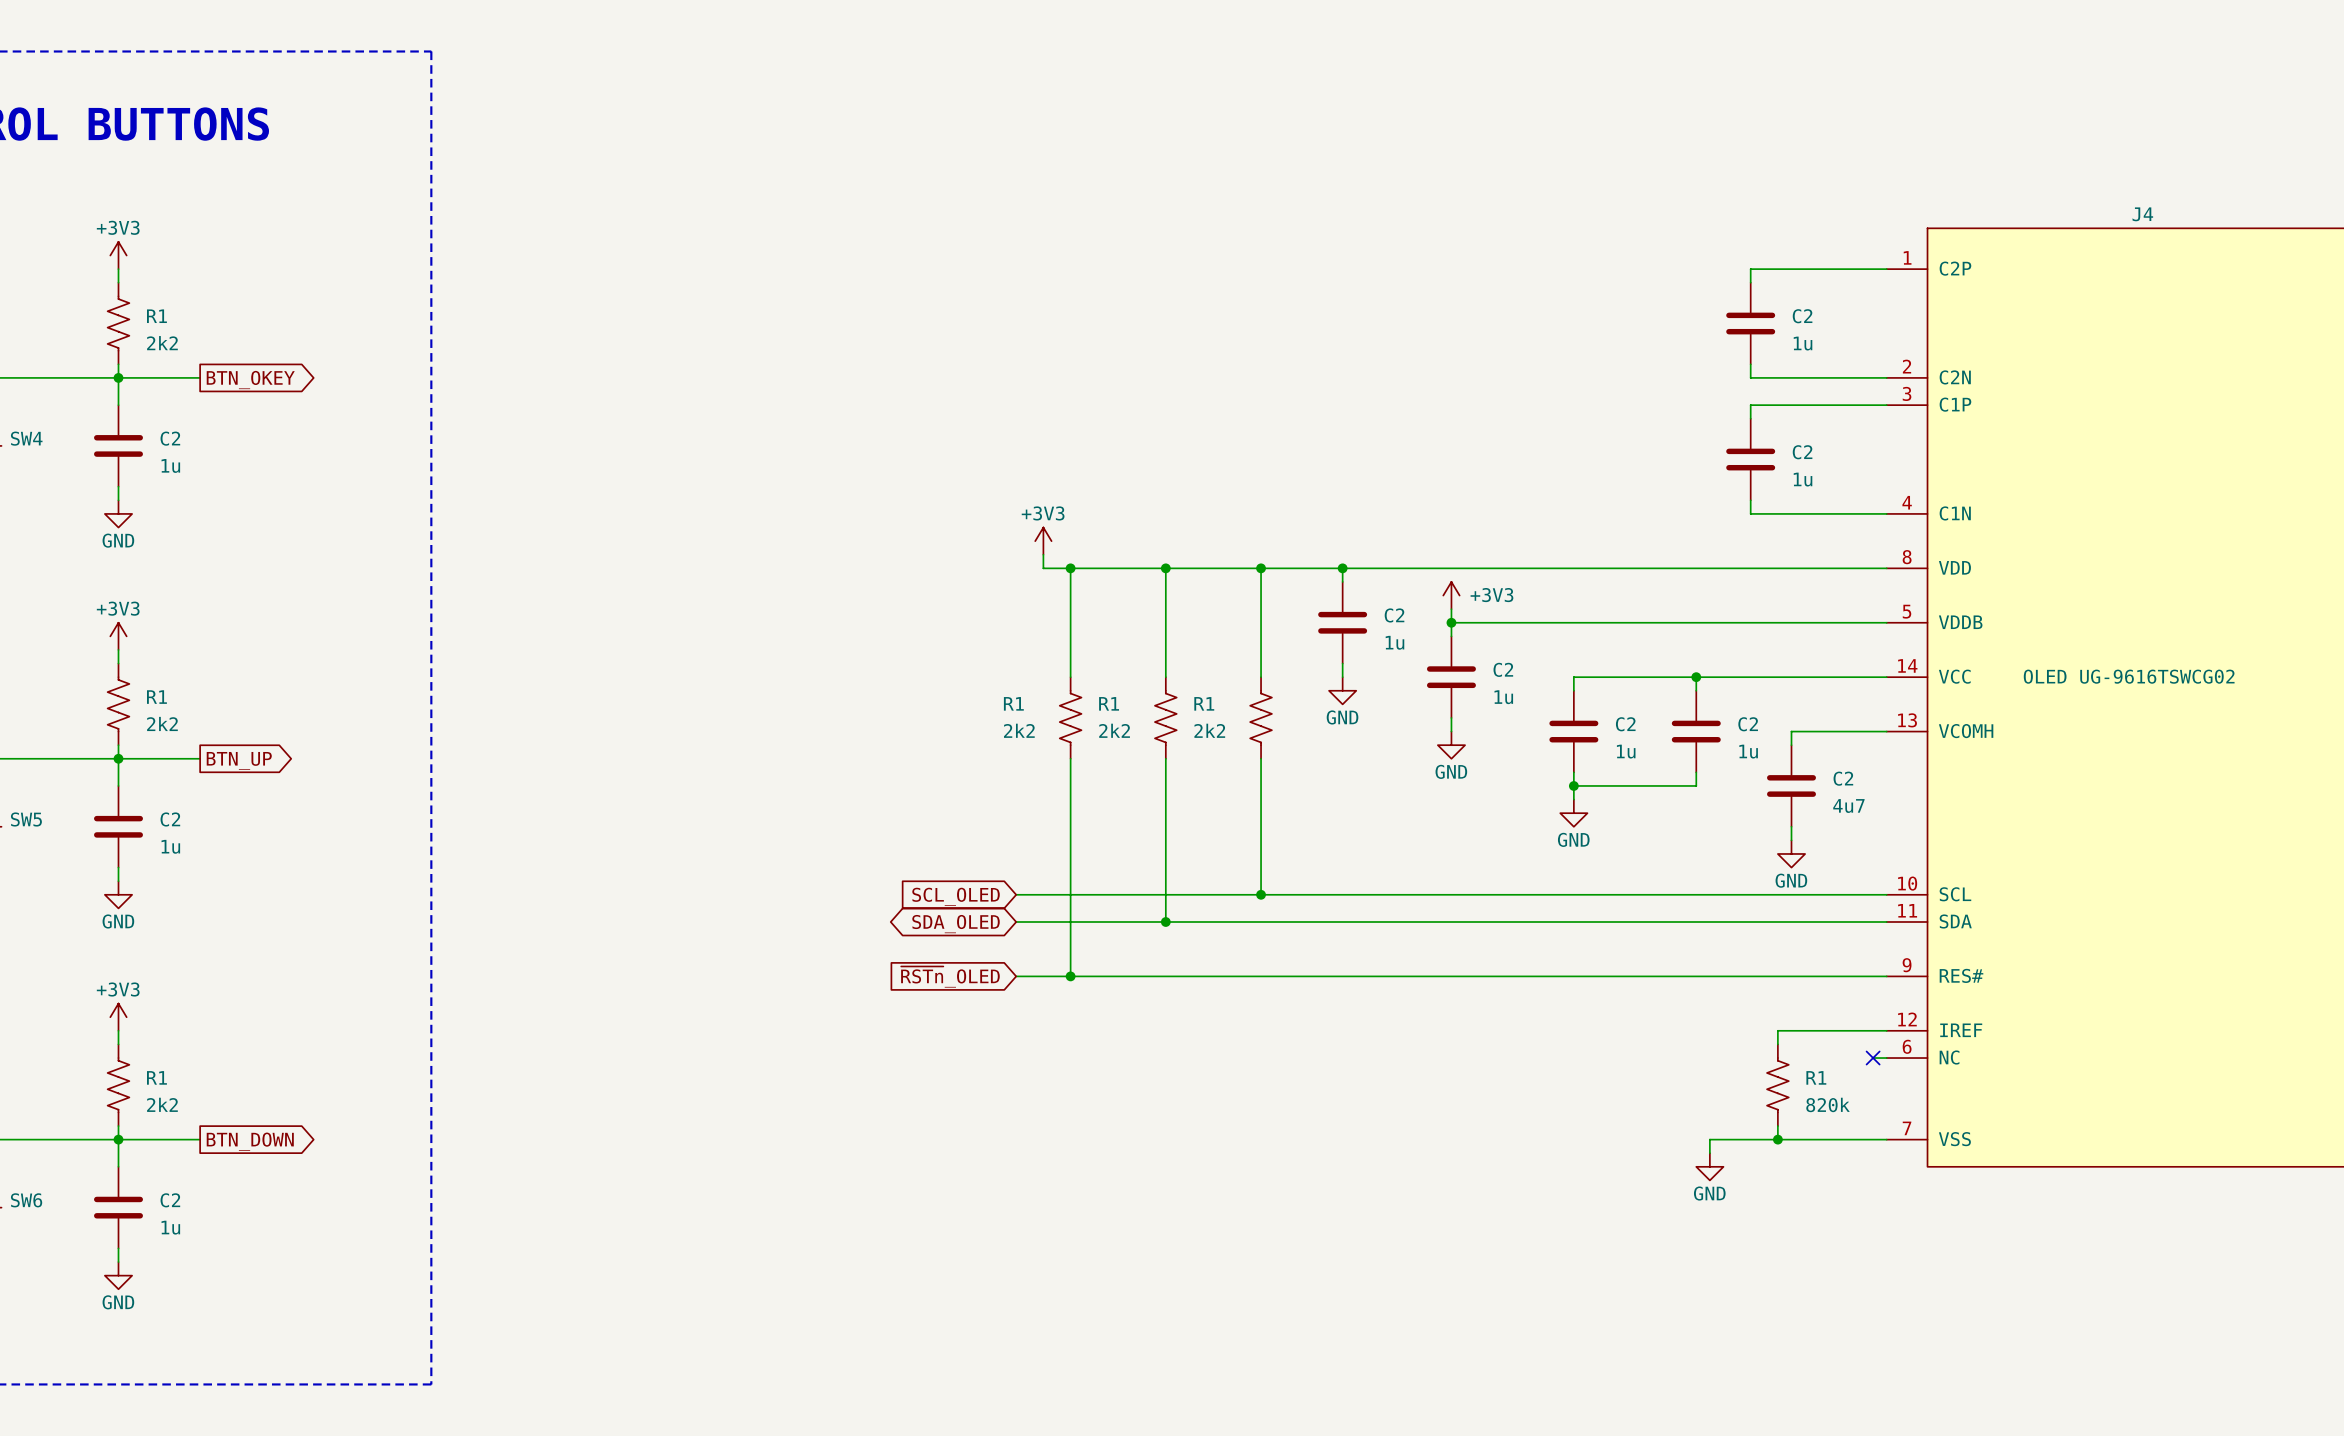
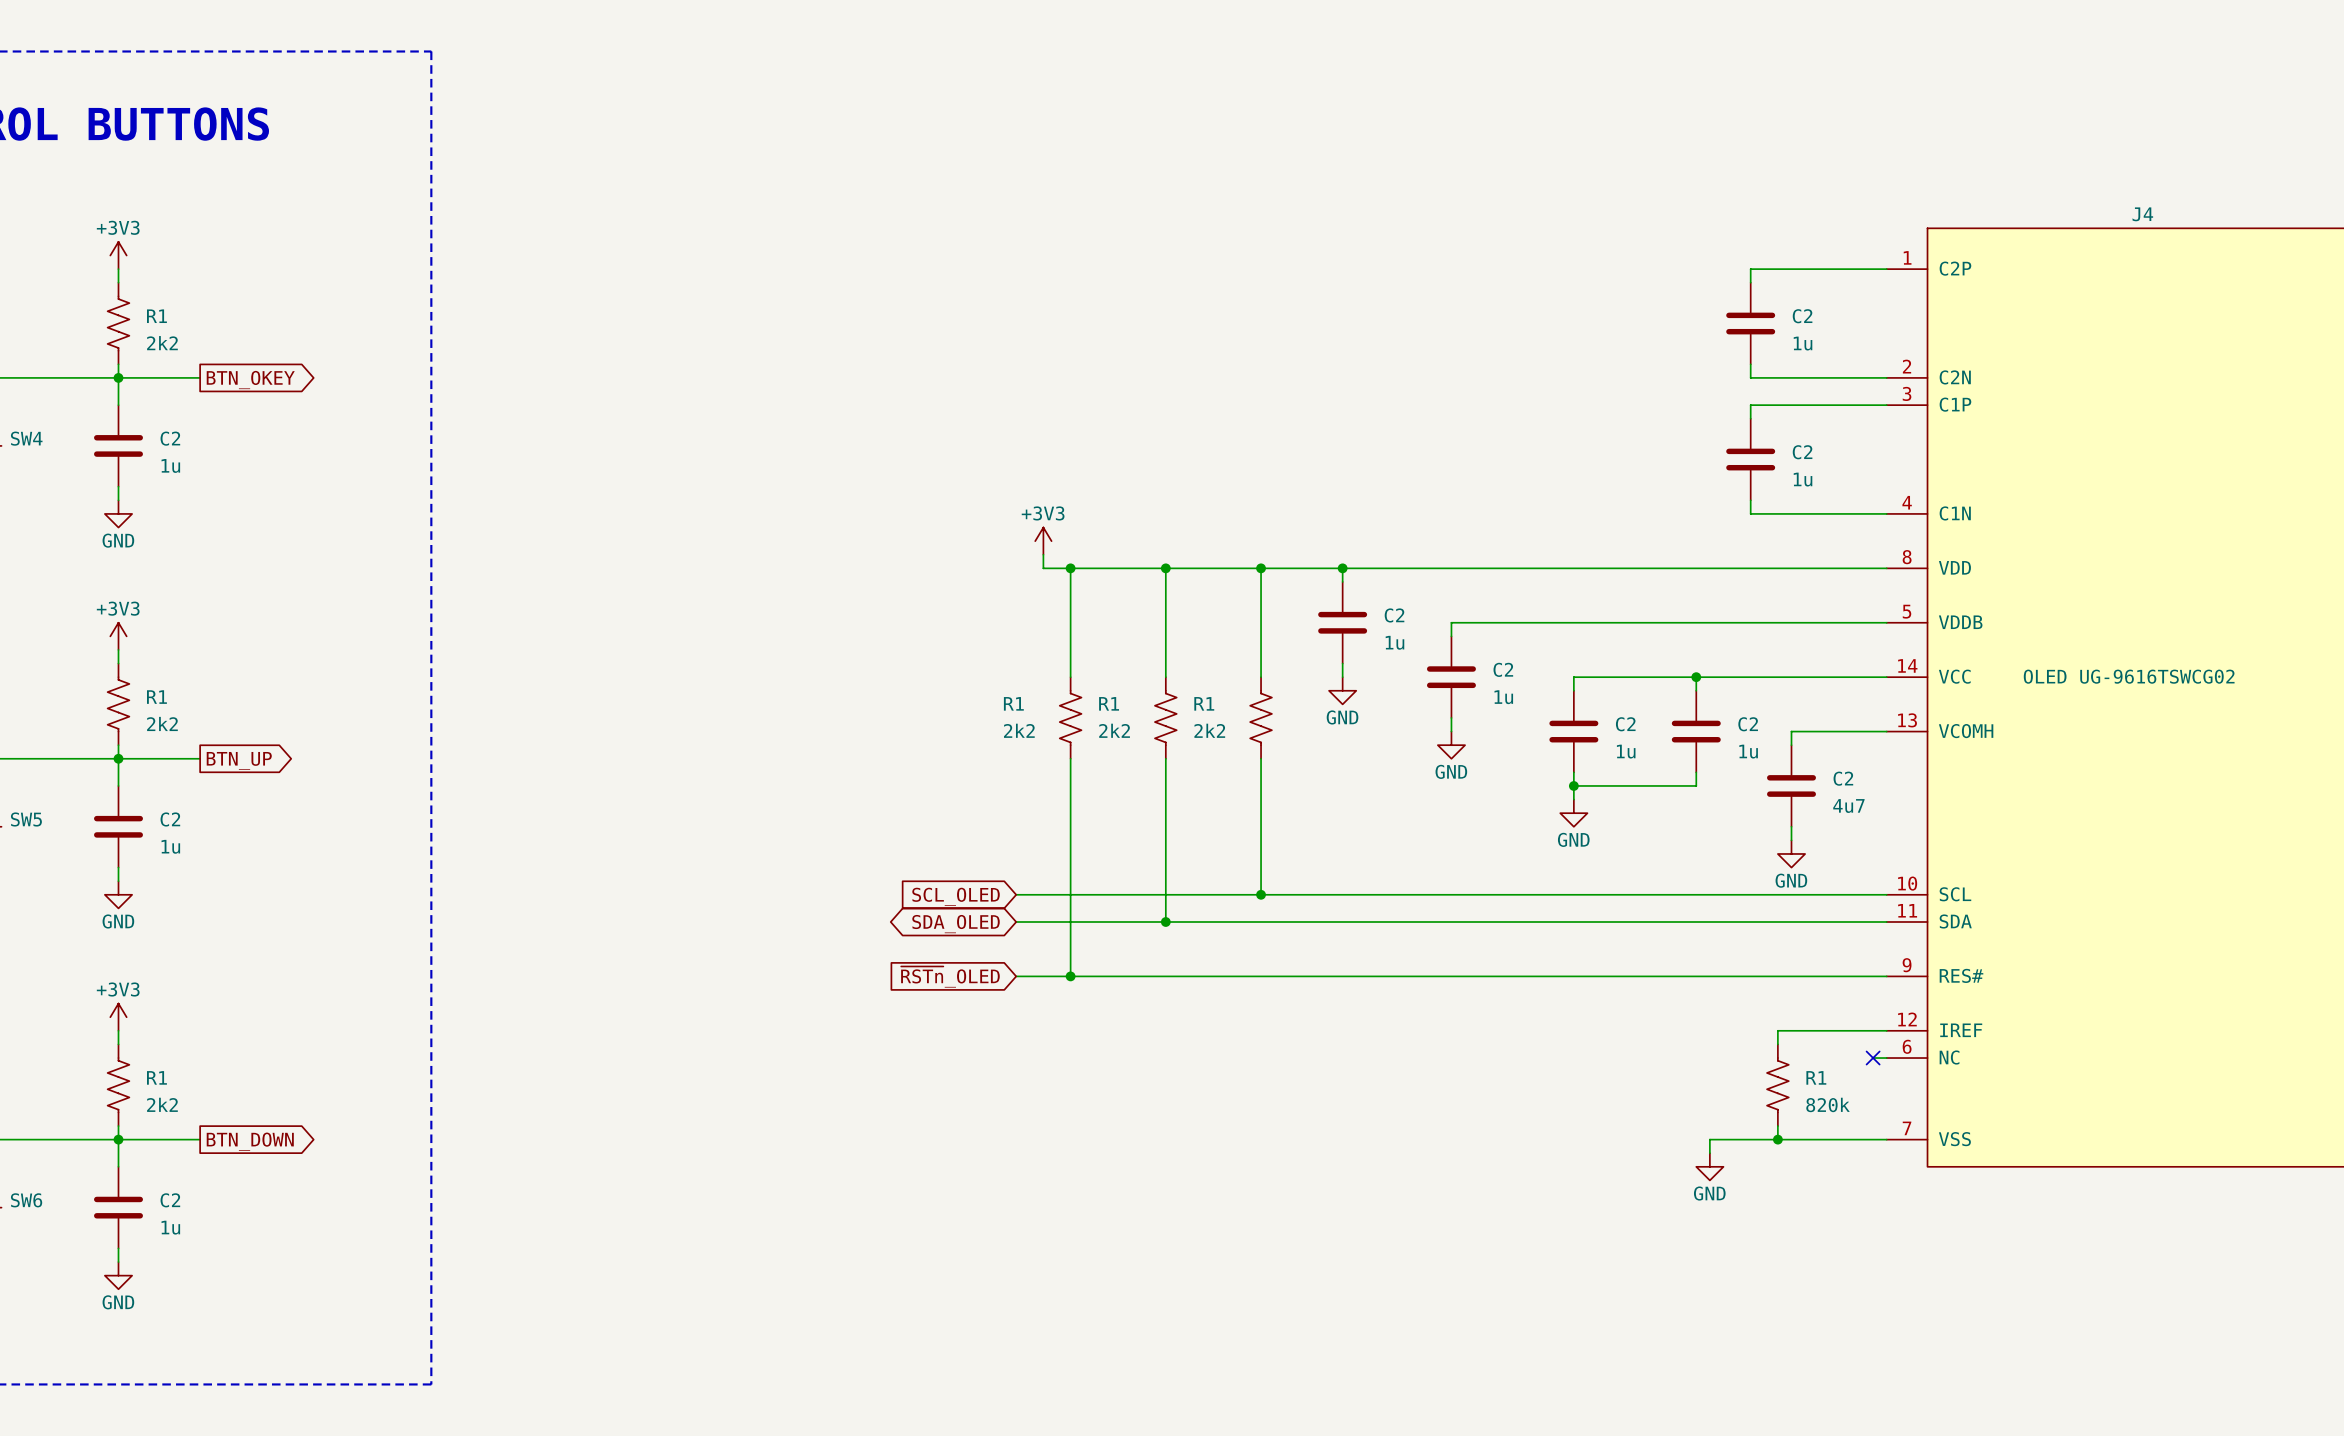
power symbol: +3V3 (1451, 595) -> none
wire: (1451, 609) (1451, 622) -> none
junction: (1451, 622) -> none

